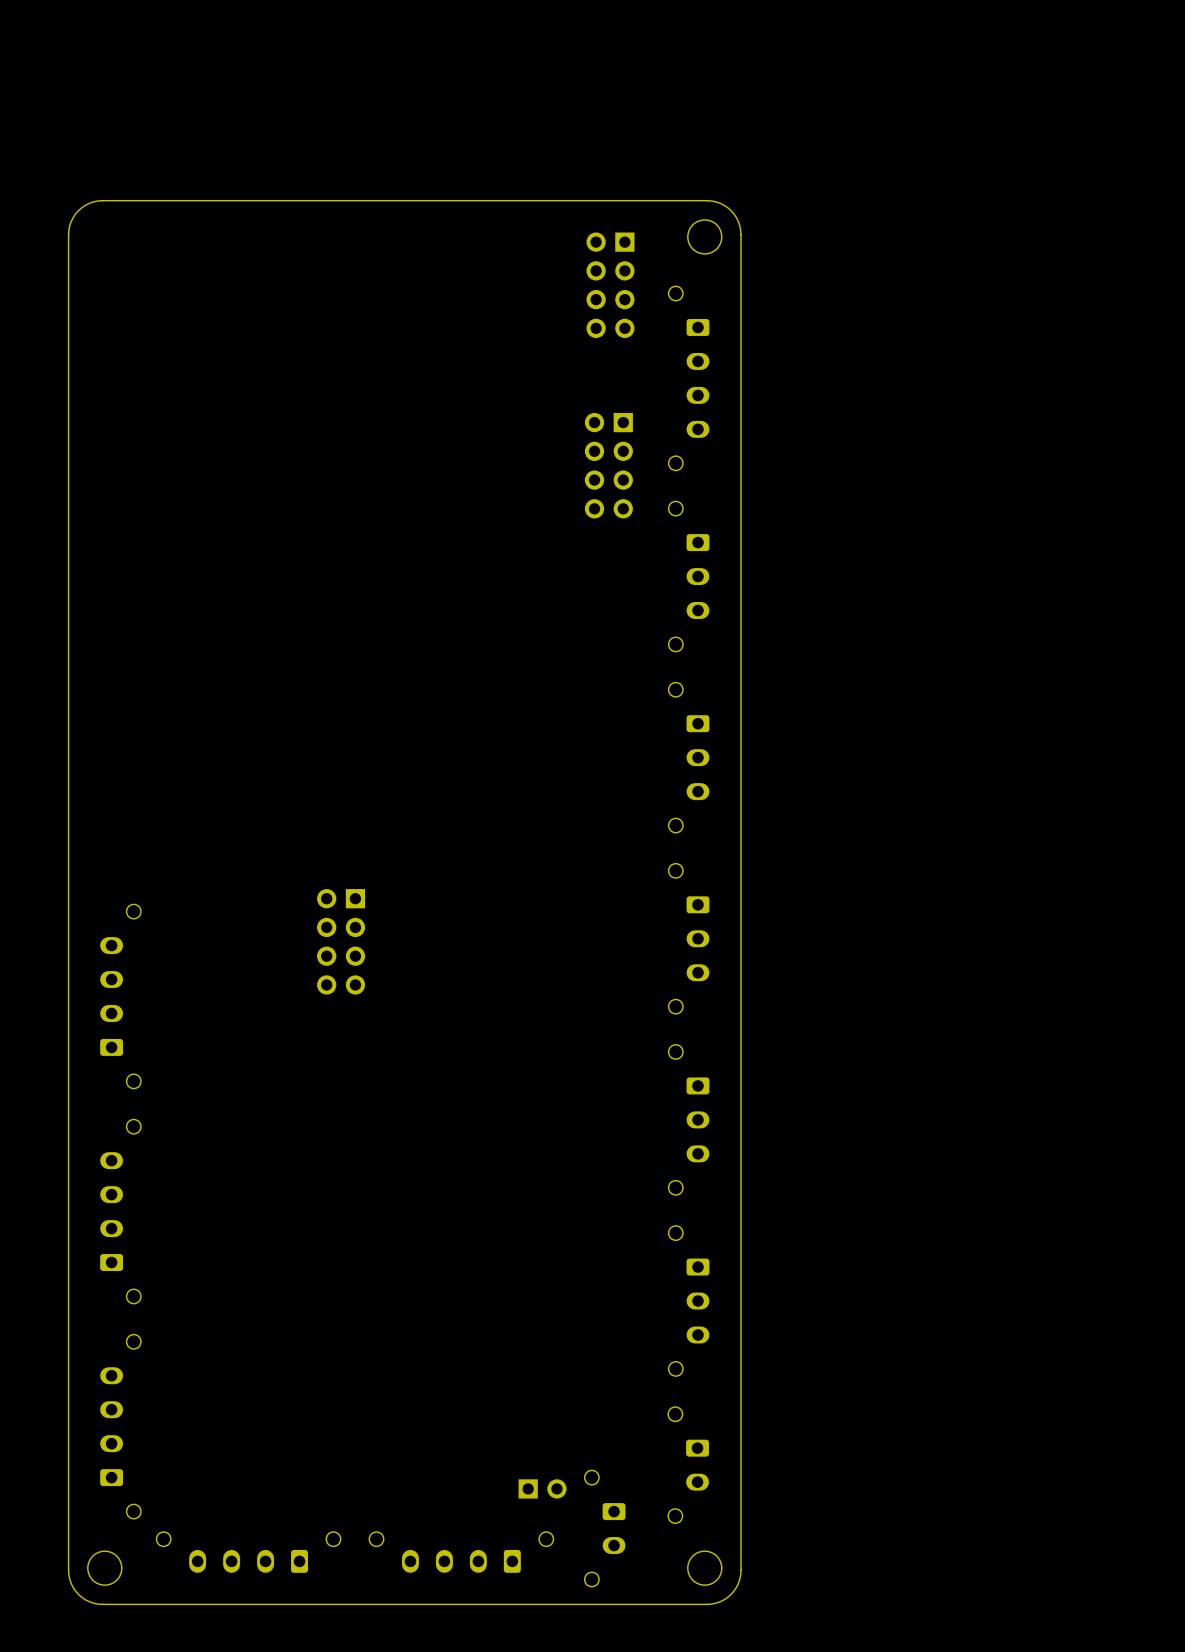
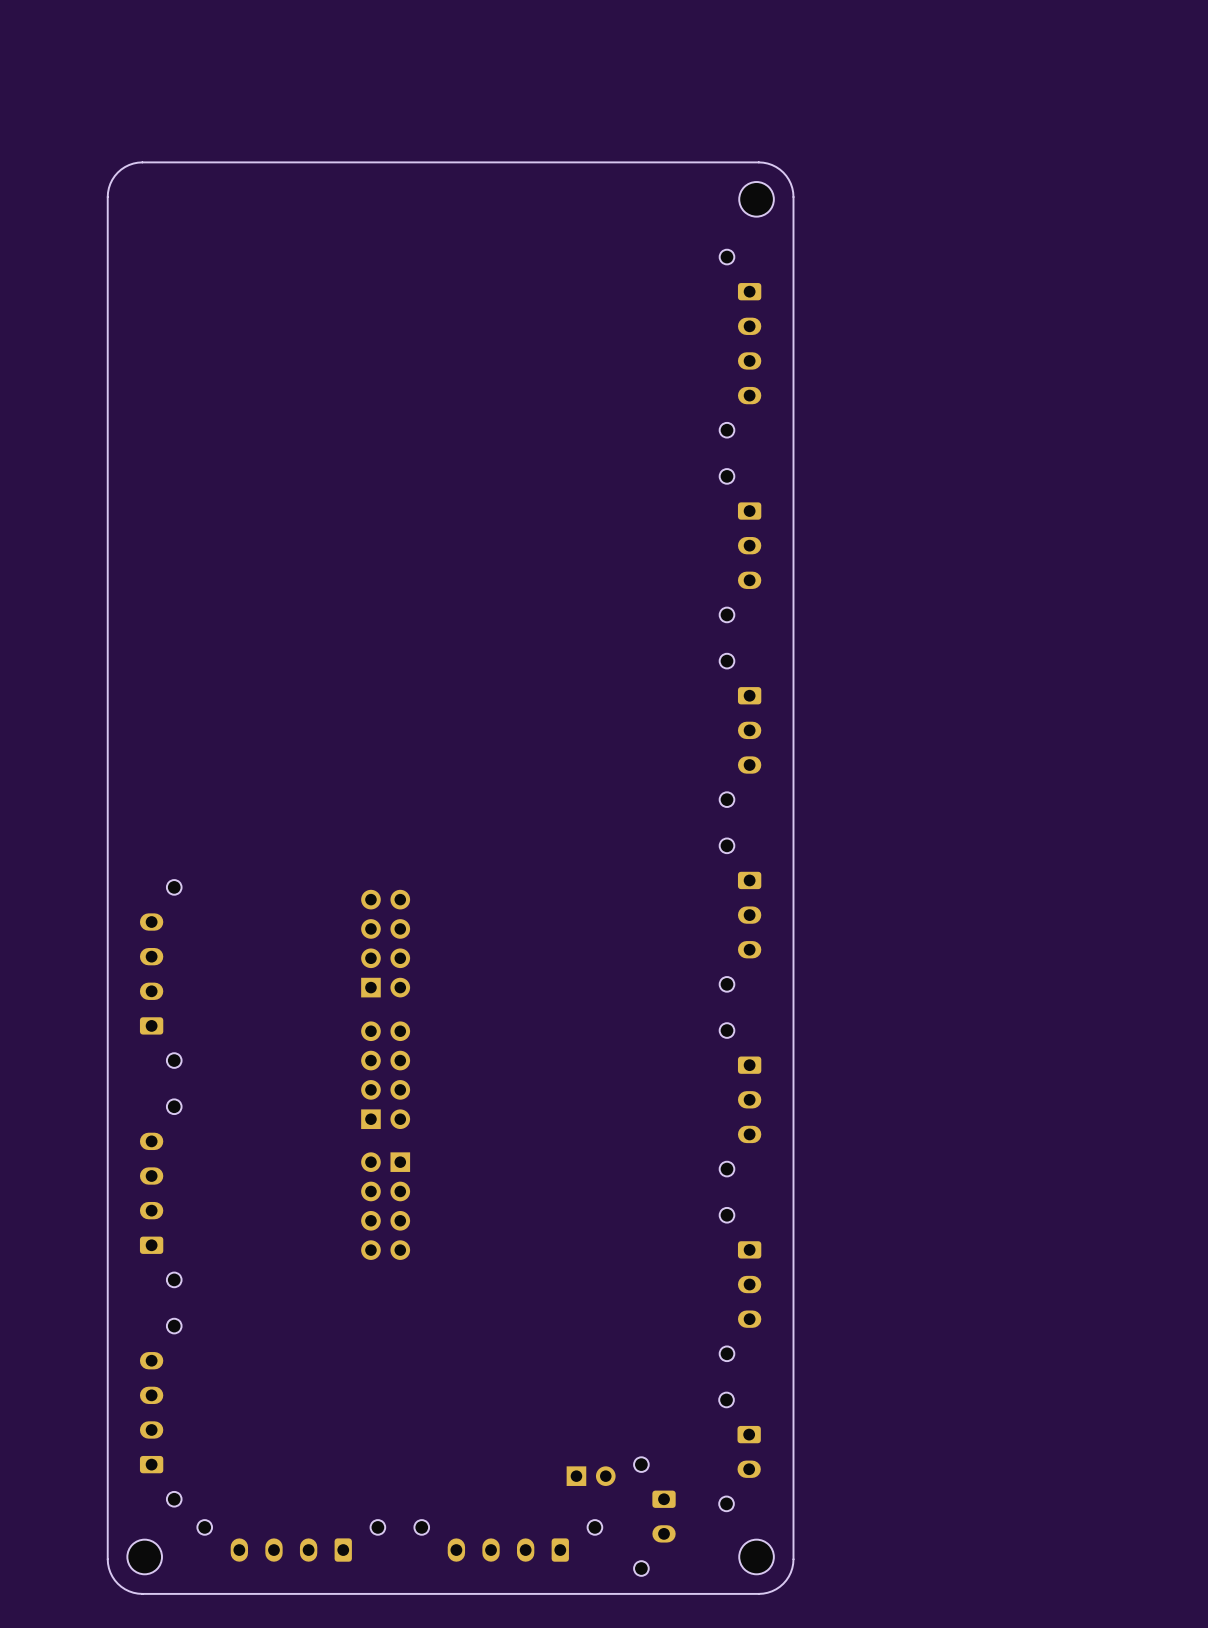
part: (610, 285) -> none
part: (608, 465) -> none
part rotation: 0° (341, 941) -> 180° (385, 943)
part: none -> (385, 1075)
part: none -> (385, 1206)

